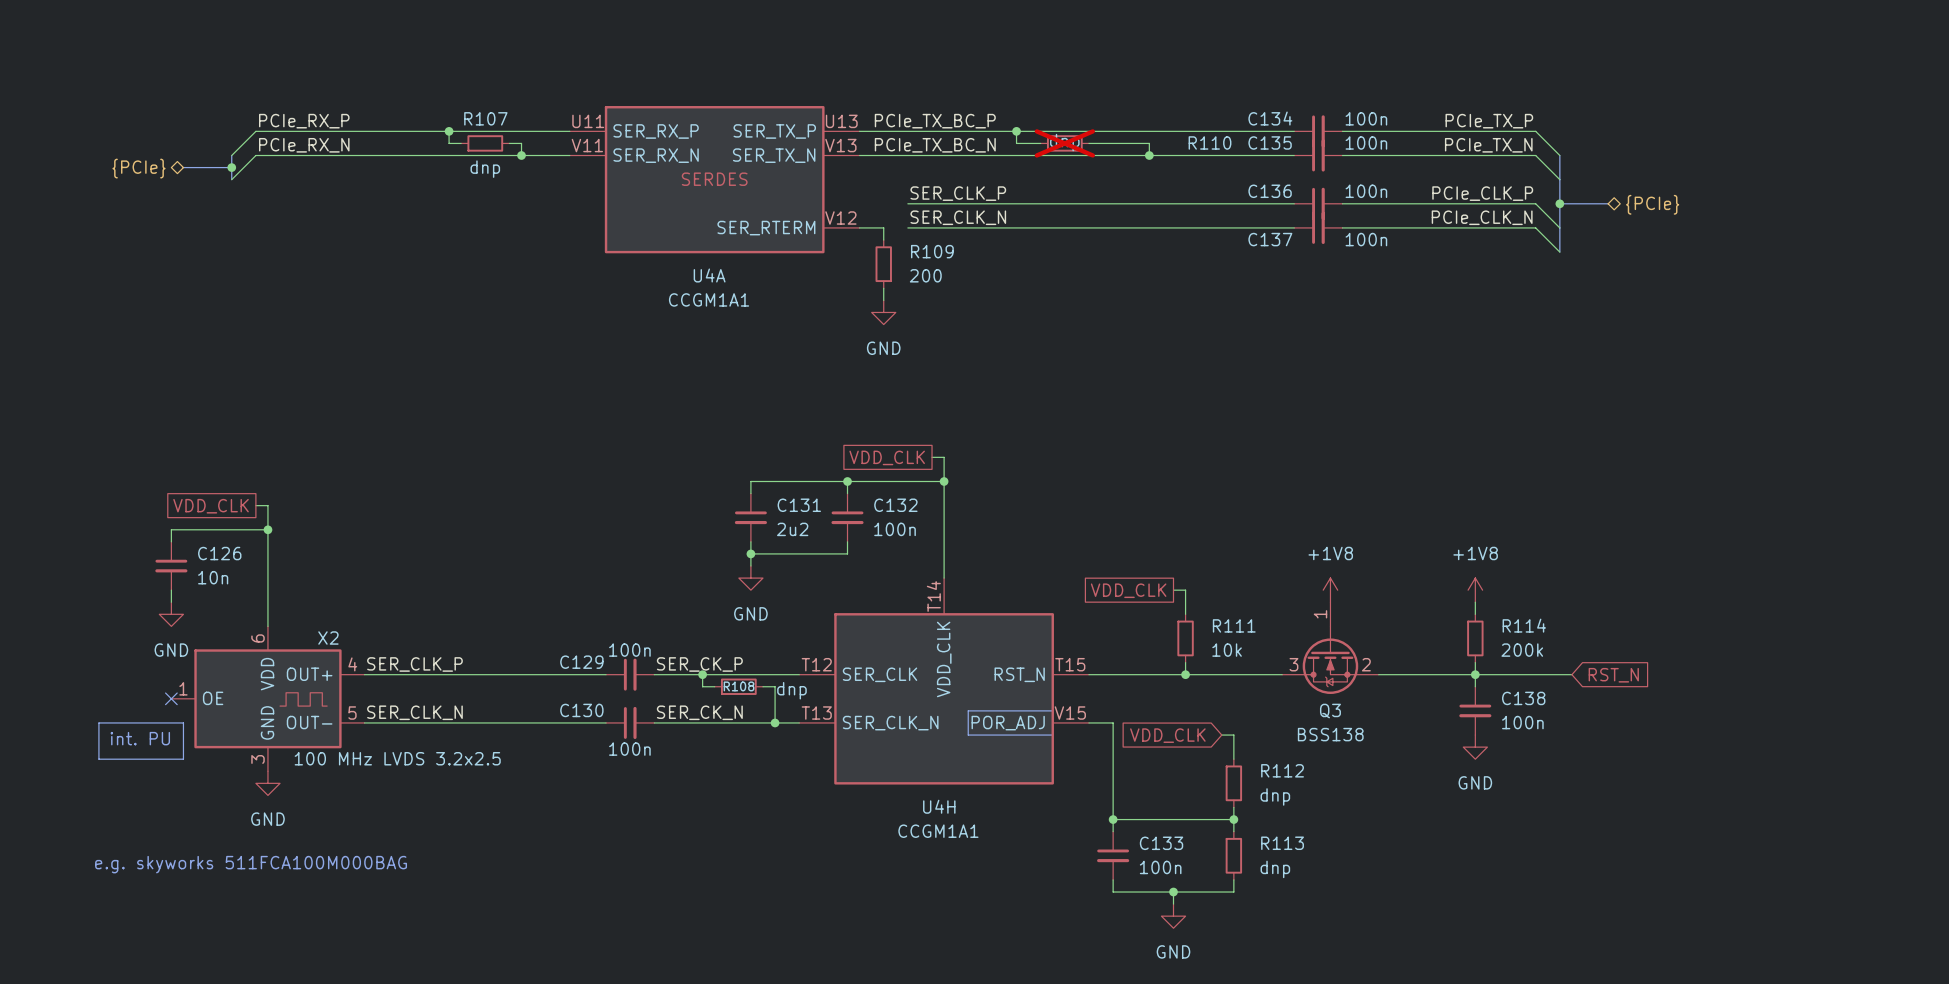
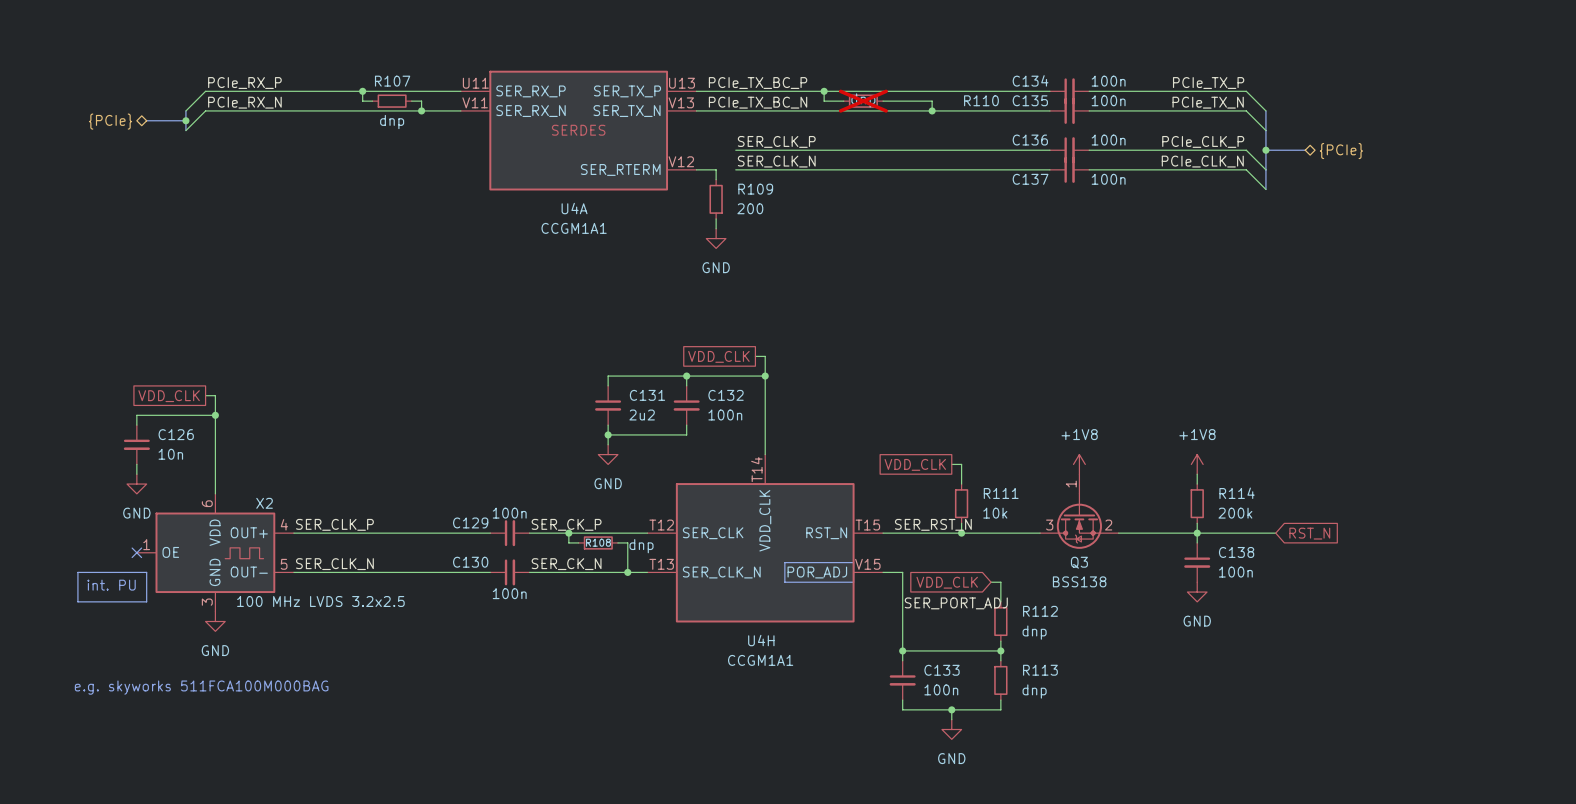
label: none -> SER_RST_N (933, 524)
label: none -> SER_PORT_ADJ (956, 603)

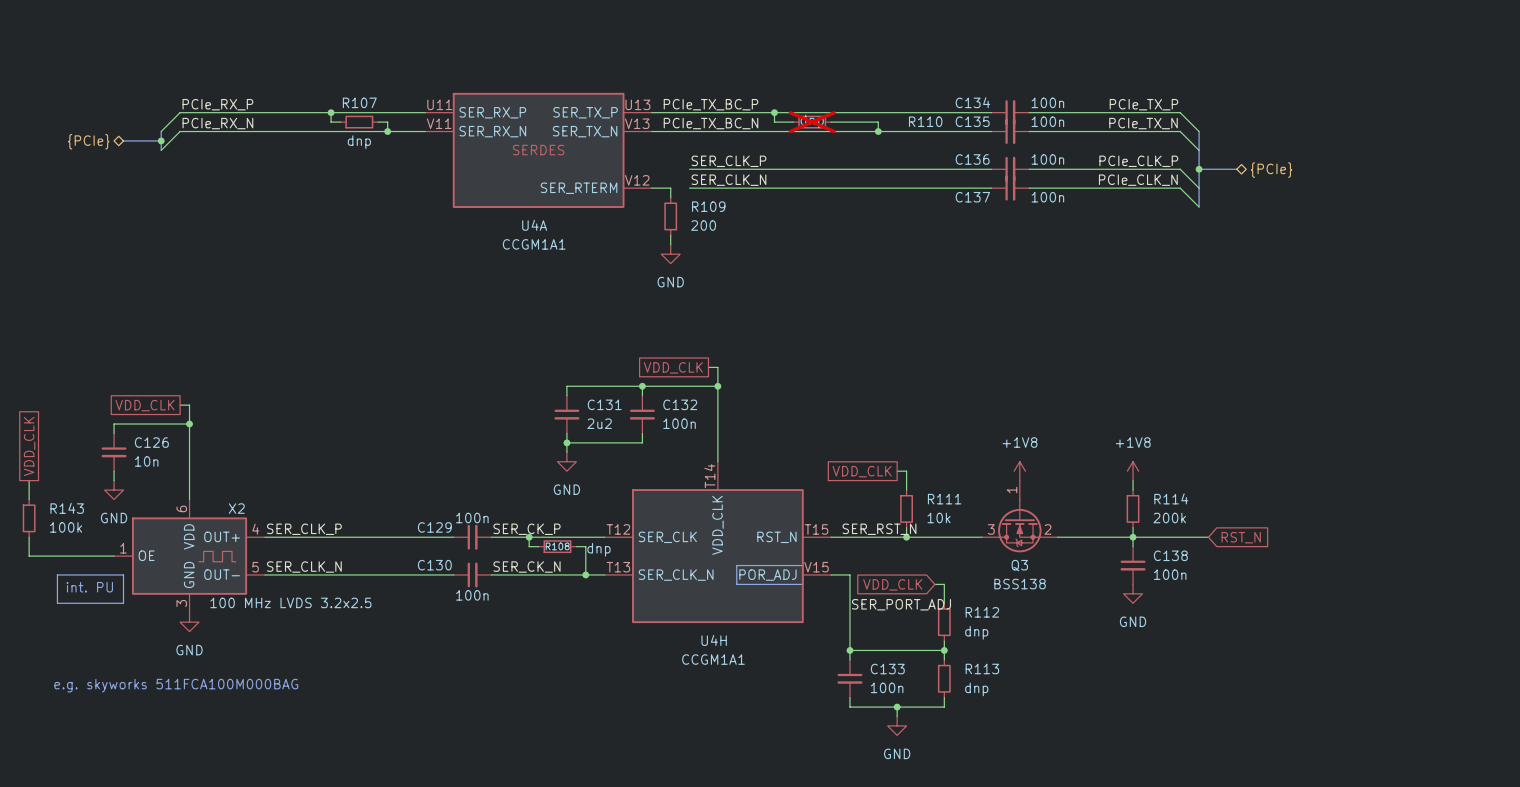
global label: none -> VDD_CLK (29, 446)
wire: none -> (29, 480) (29, 499)
R143: none -> 100k (29, 518)
wire: none -> (29, 537) (29, 556) (114, 556)
no-connect mark: (136, 552) -> none

